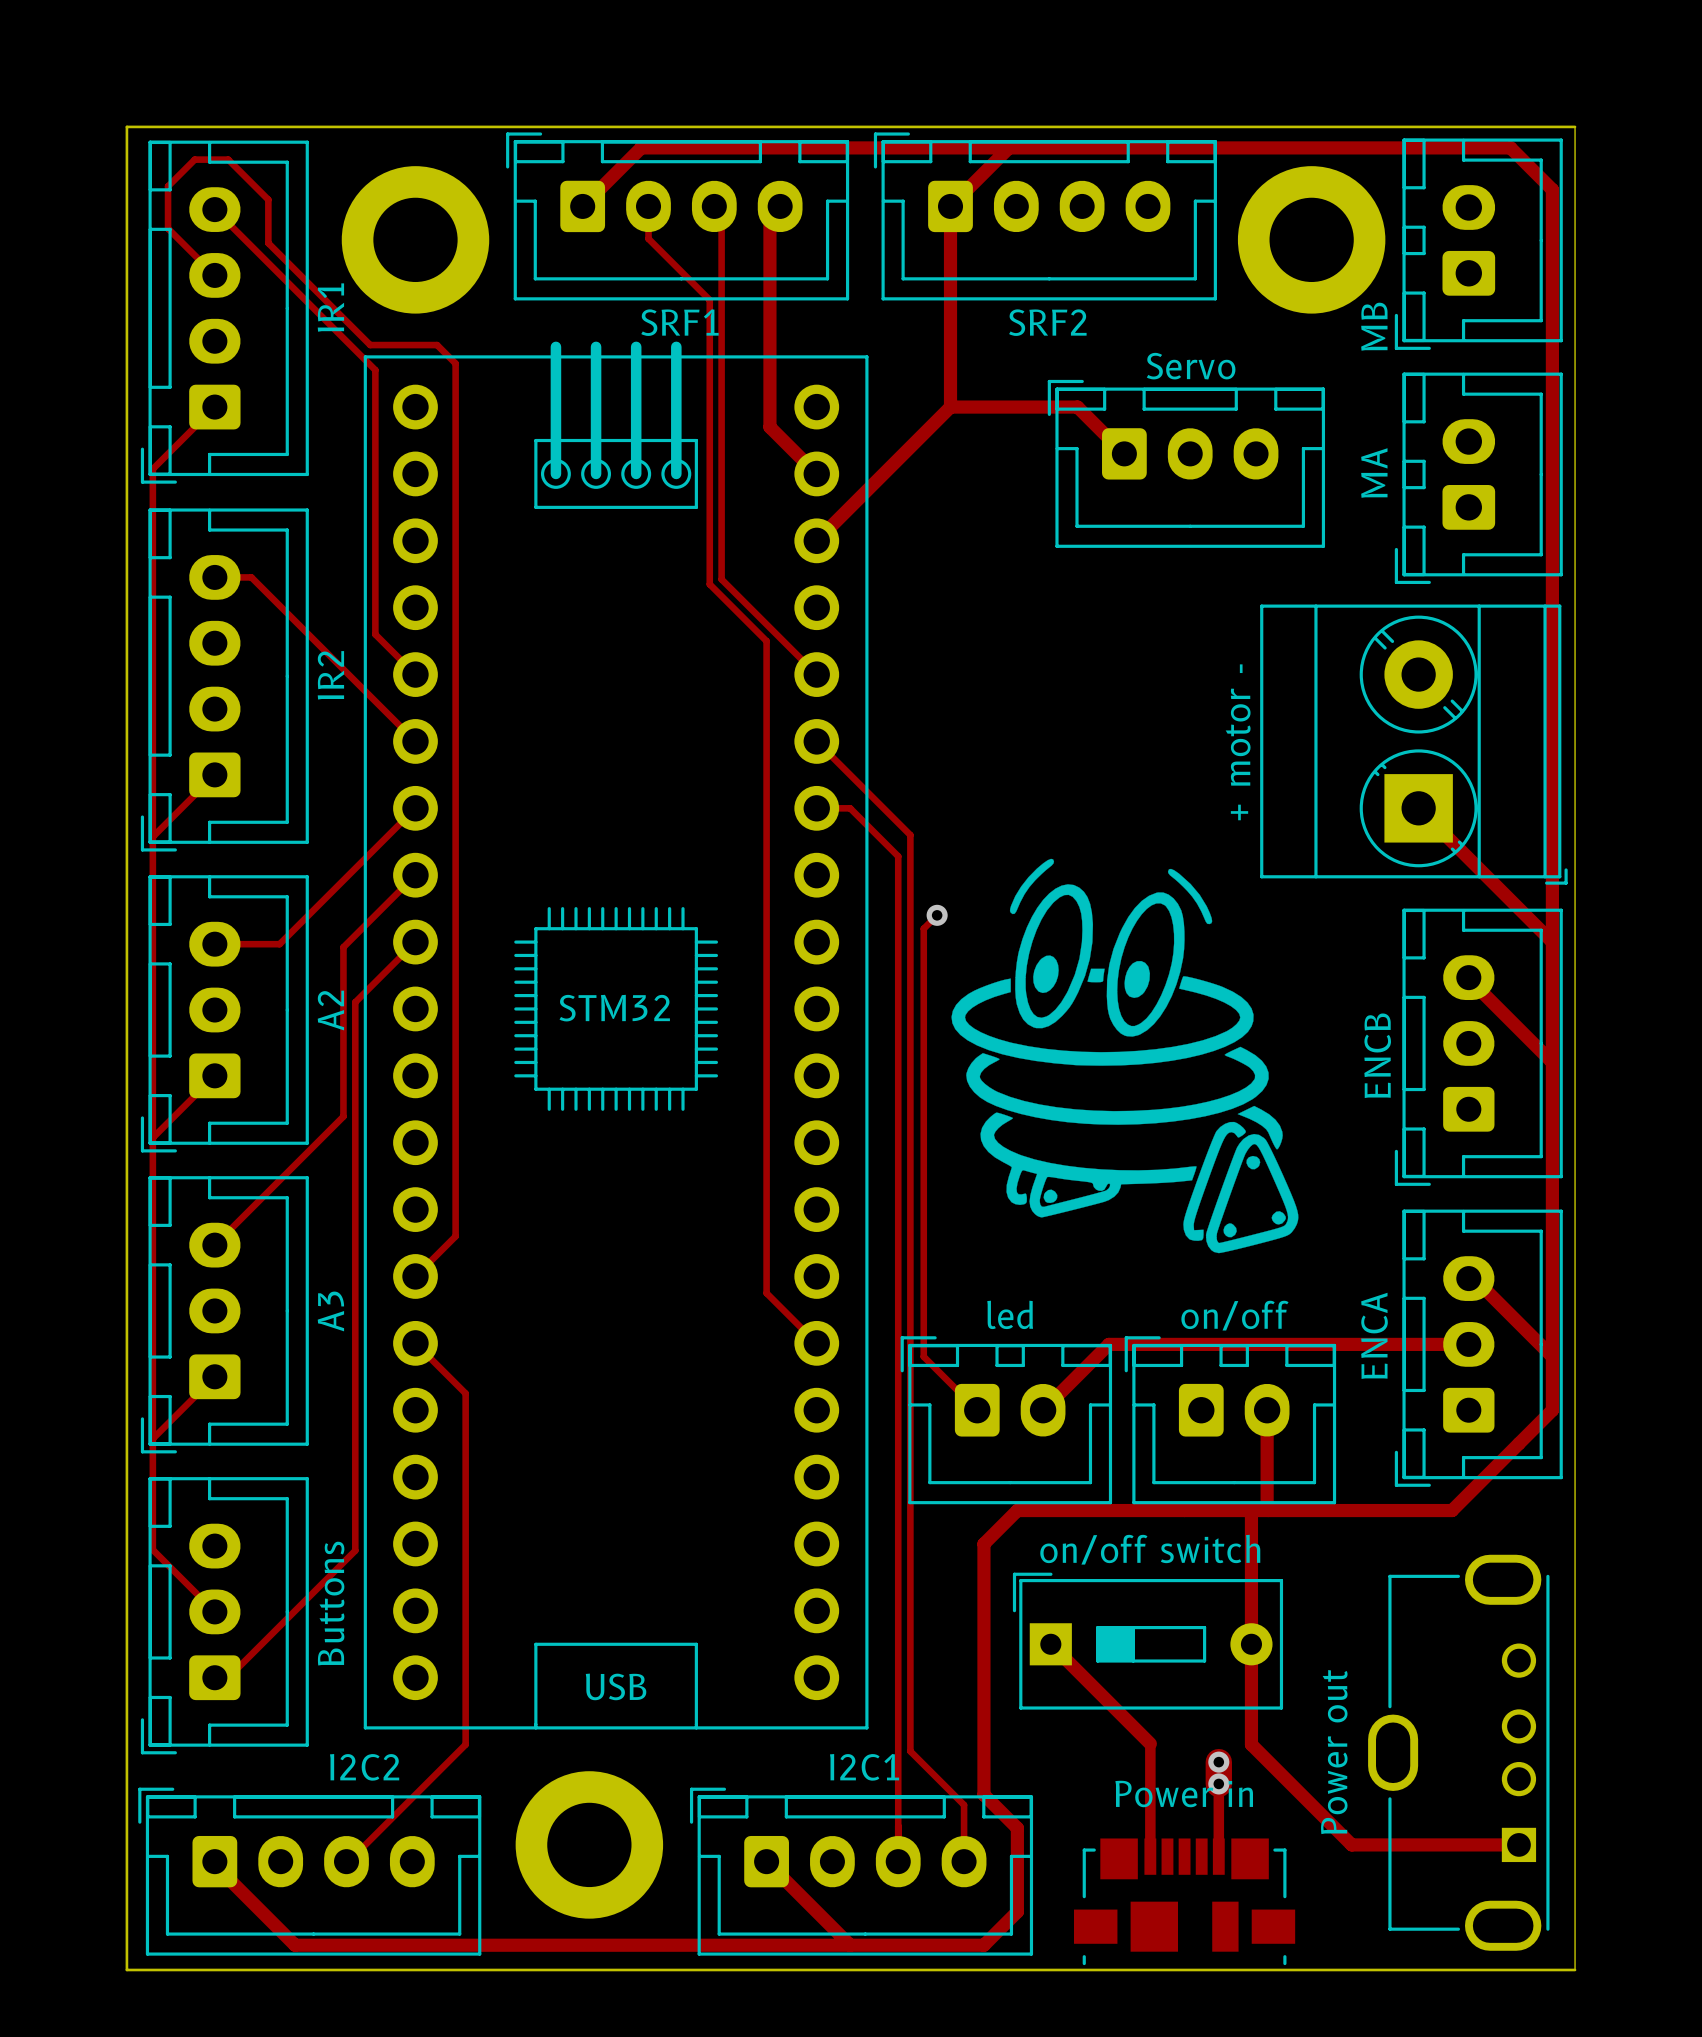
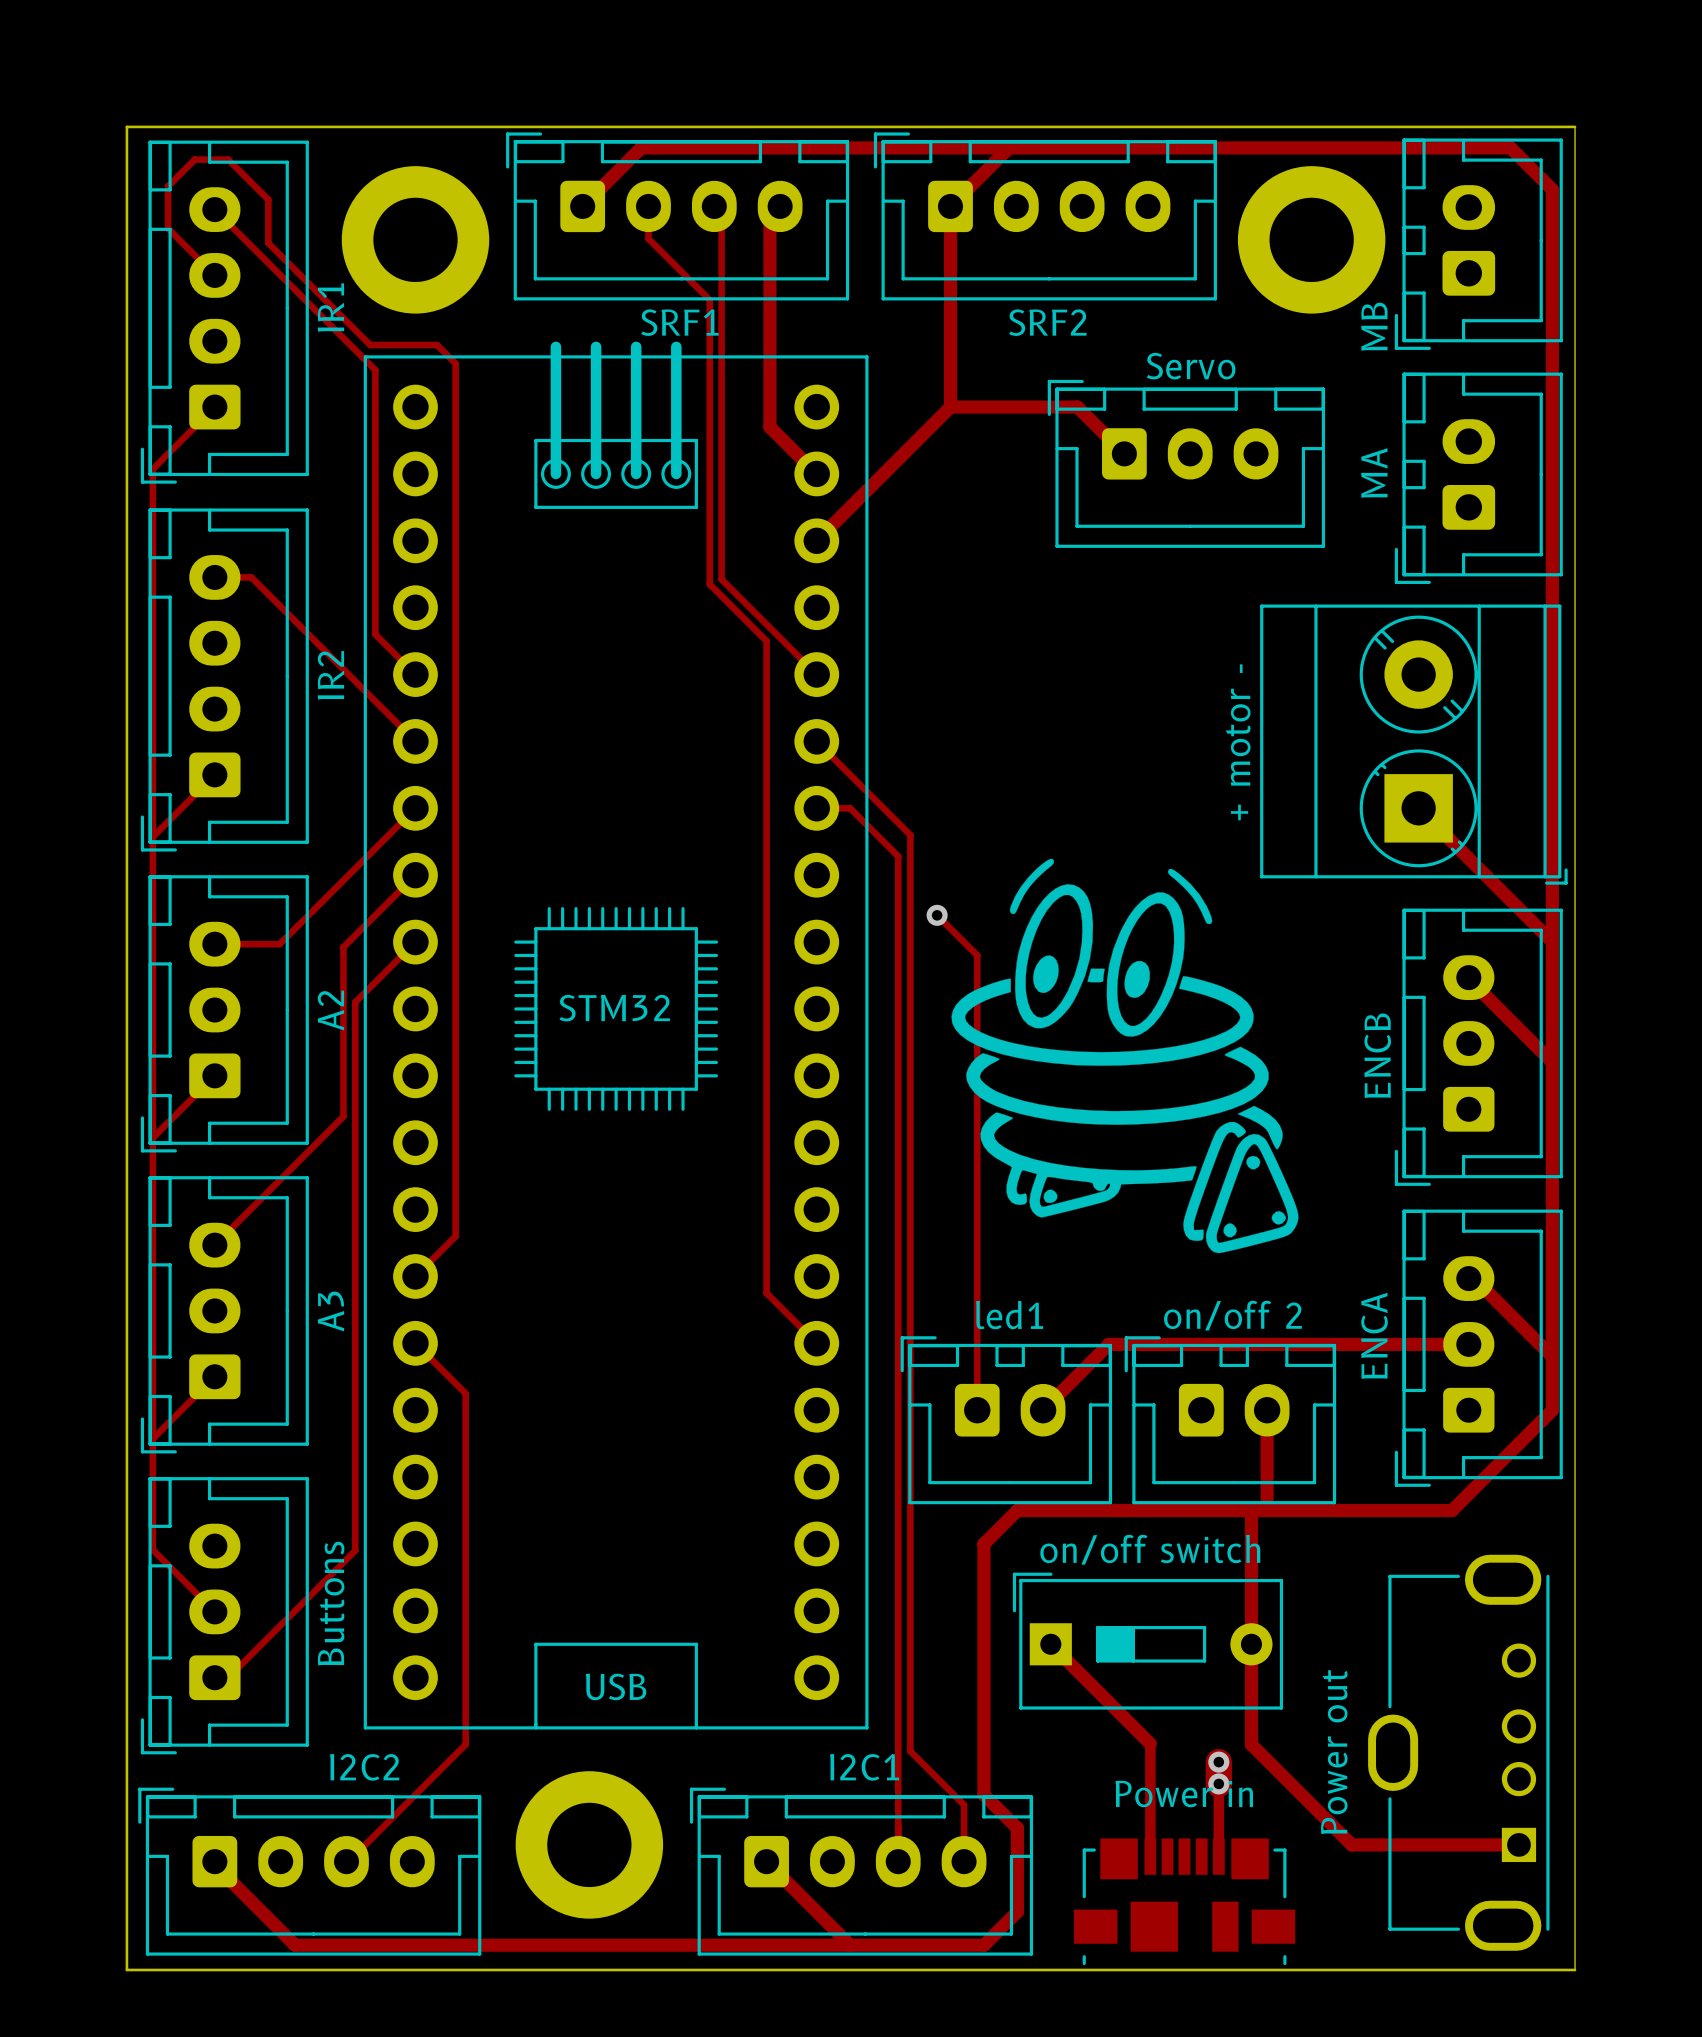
track: (937, 915) (923, 928) (923, 1356) (977, 1410) -> (937, 915) (977, 955) (977, 1410)
led1 value: led (1010, 1314) -> none
led1 name: none -> led1 (1009, 1315)
part value: on/off (1234, 1315) -> on/off 2 (1232, 1315)

